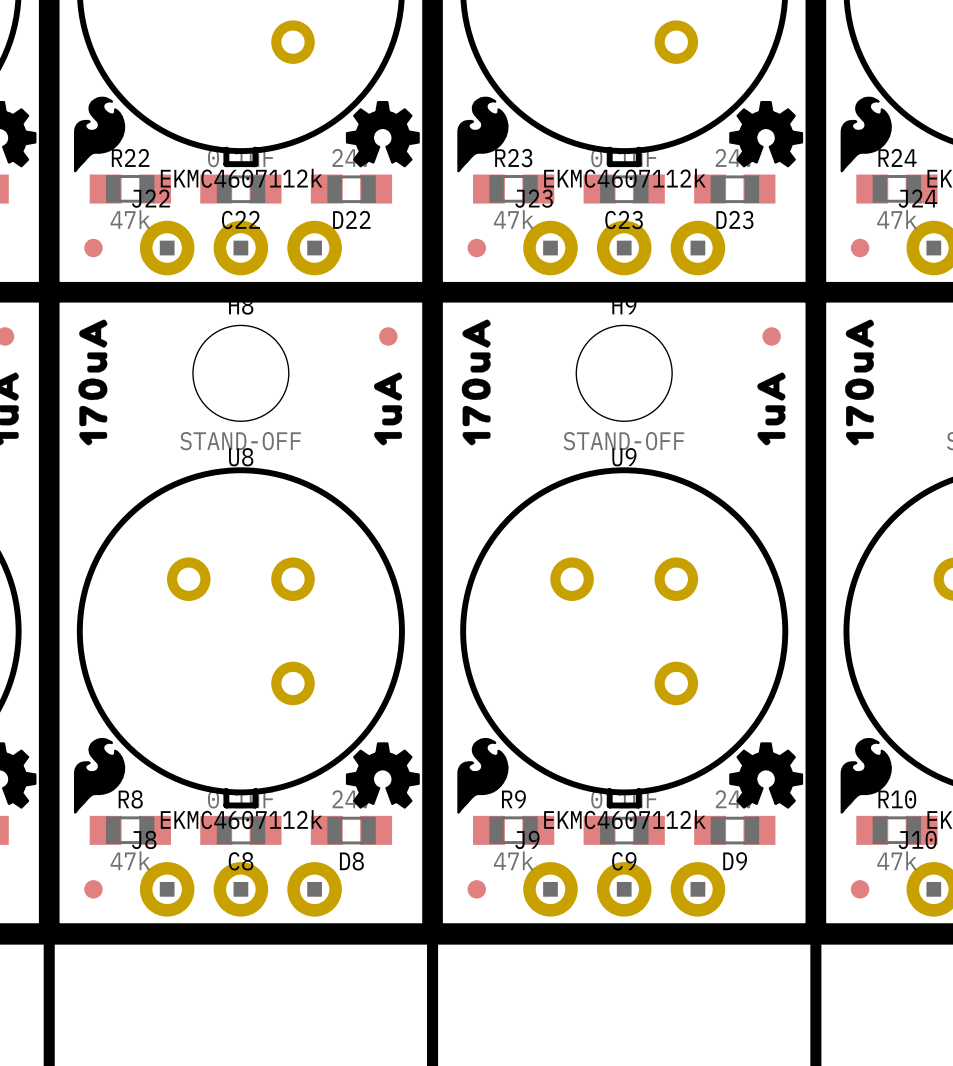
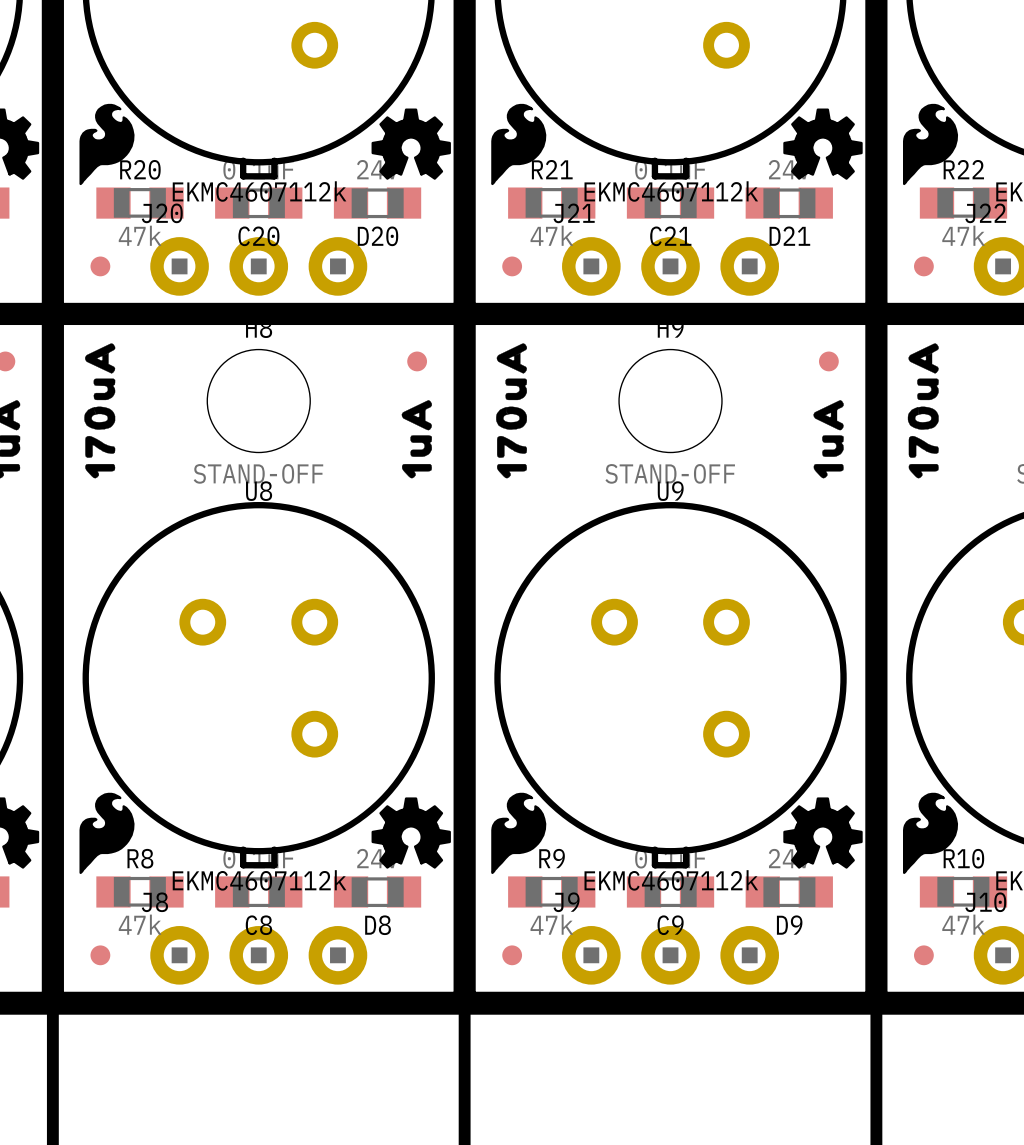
R22 name: R22 (130, 157) -> R20 (140, 169)
R24 name: R24 (897, 157) -> R22 (963, 169)
R23 name: R23 (513, 158) -> R21 (552, 169)
J22 name: J22 (150, 198) -> J20 (162, 213)
J23 name: J23 (534, 198) -> J21 (574, 213)
J24 name: J24 (917, 198) -> J22 (985, 213)
D22 name: D22 (351, 219) -> D20 (378, 236)
C22 name: C22 (240, 220) -> C20 (258, 236)
C23 name: C23 (624, 220) -> C21 (670, 236)
D23 name: D23 (734, 220) -> D21 (789, 236)

